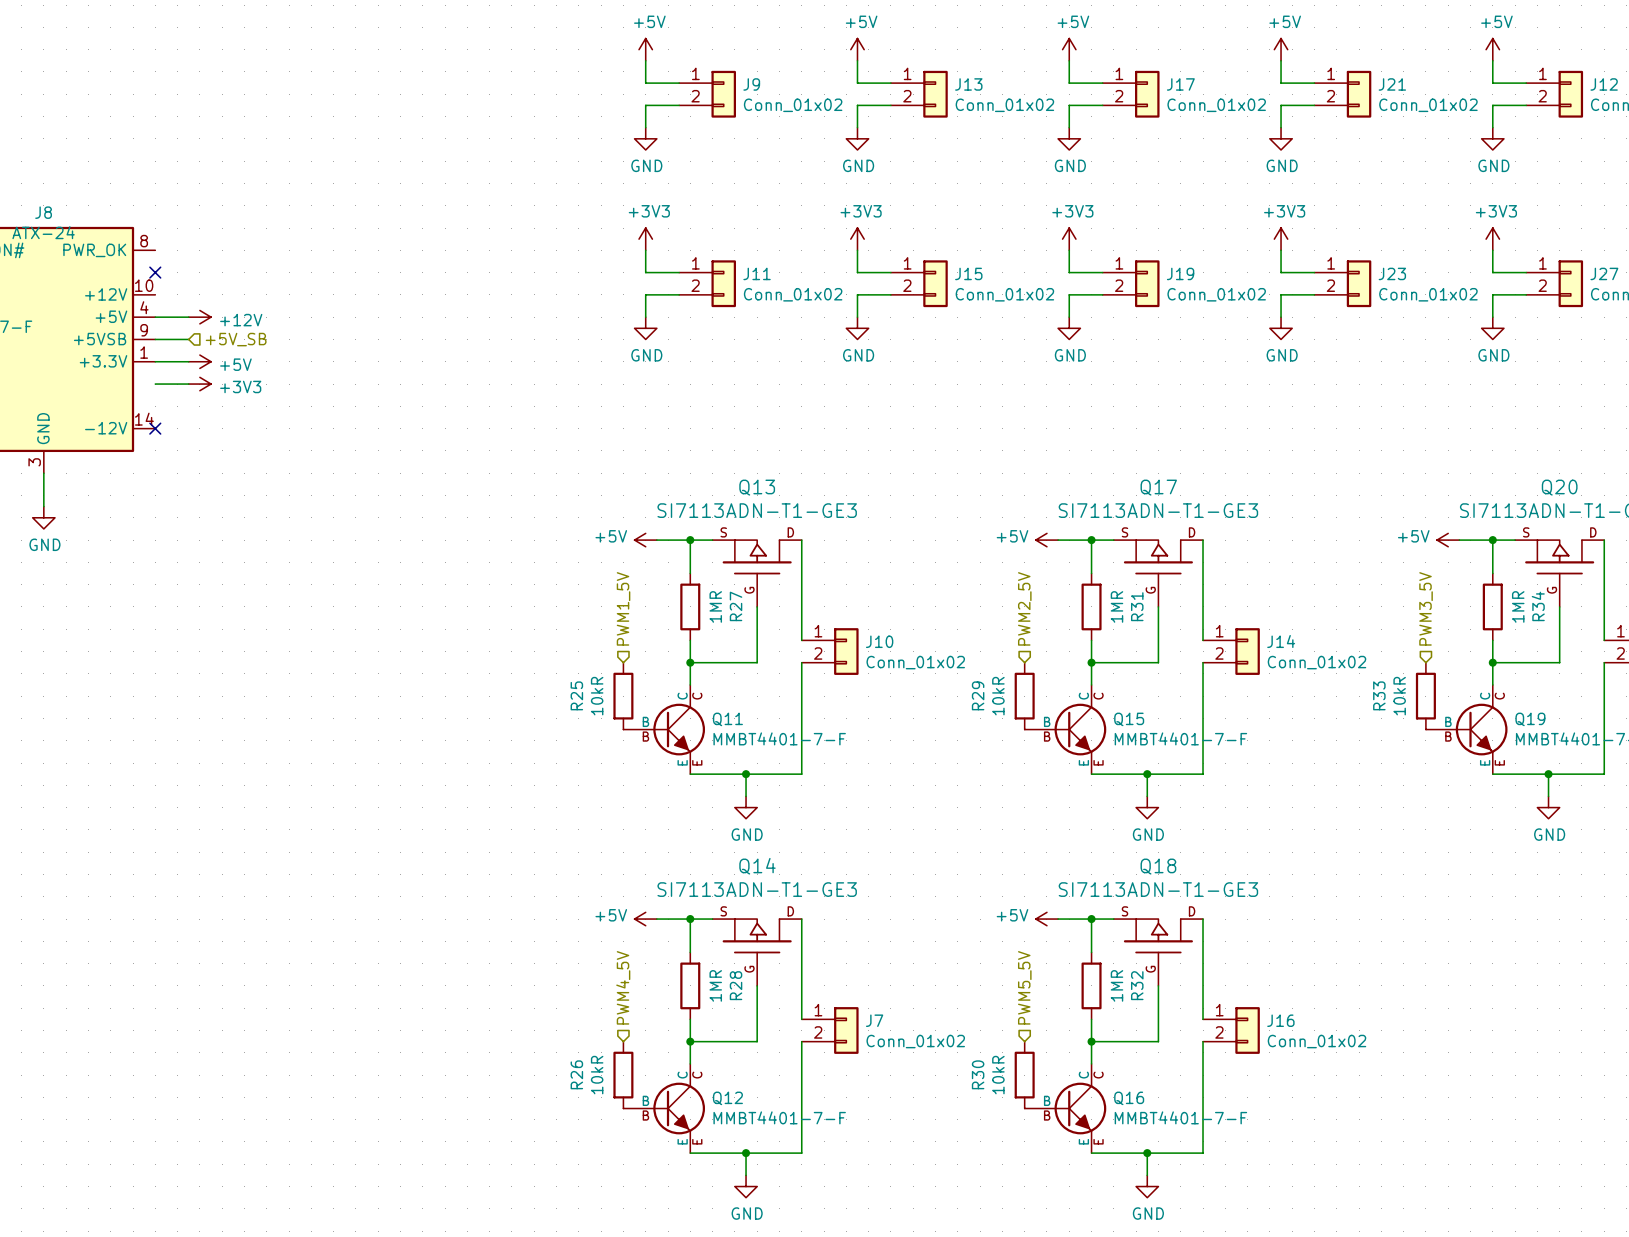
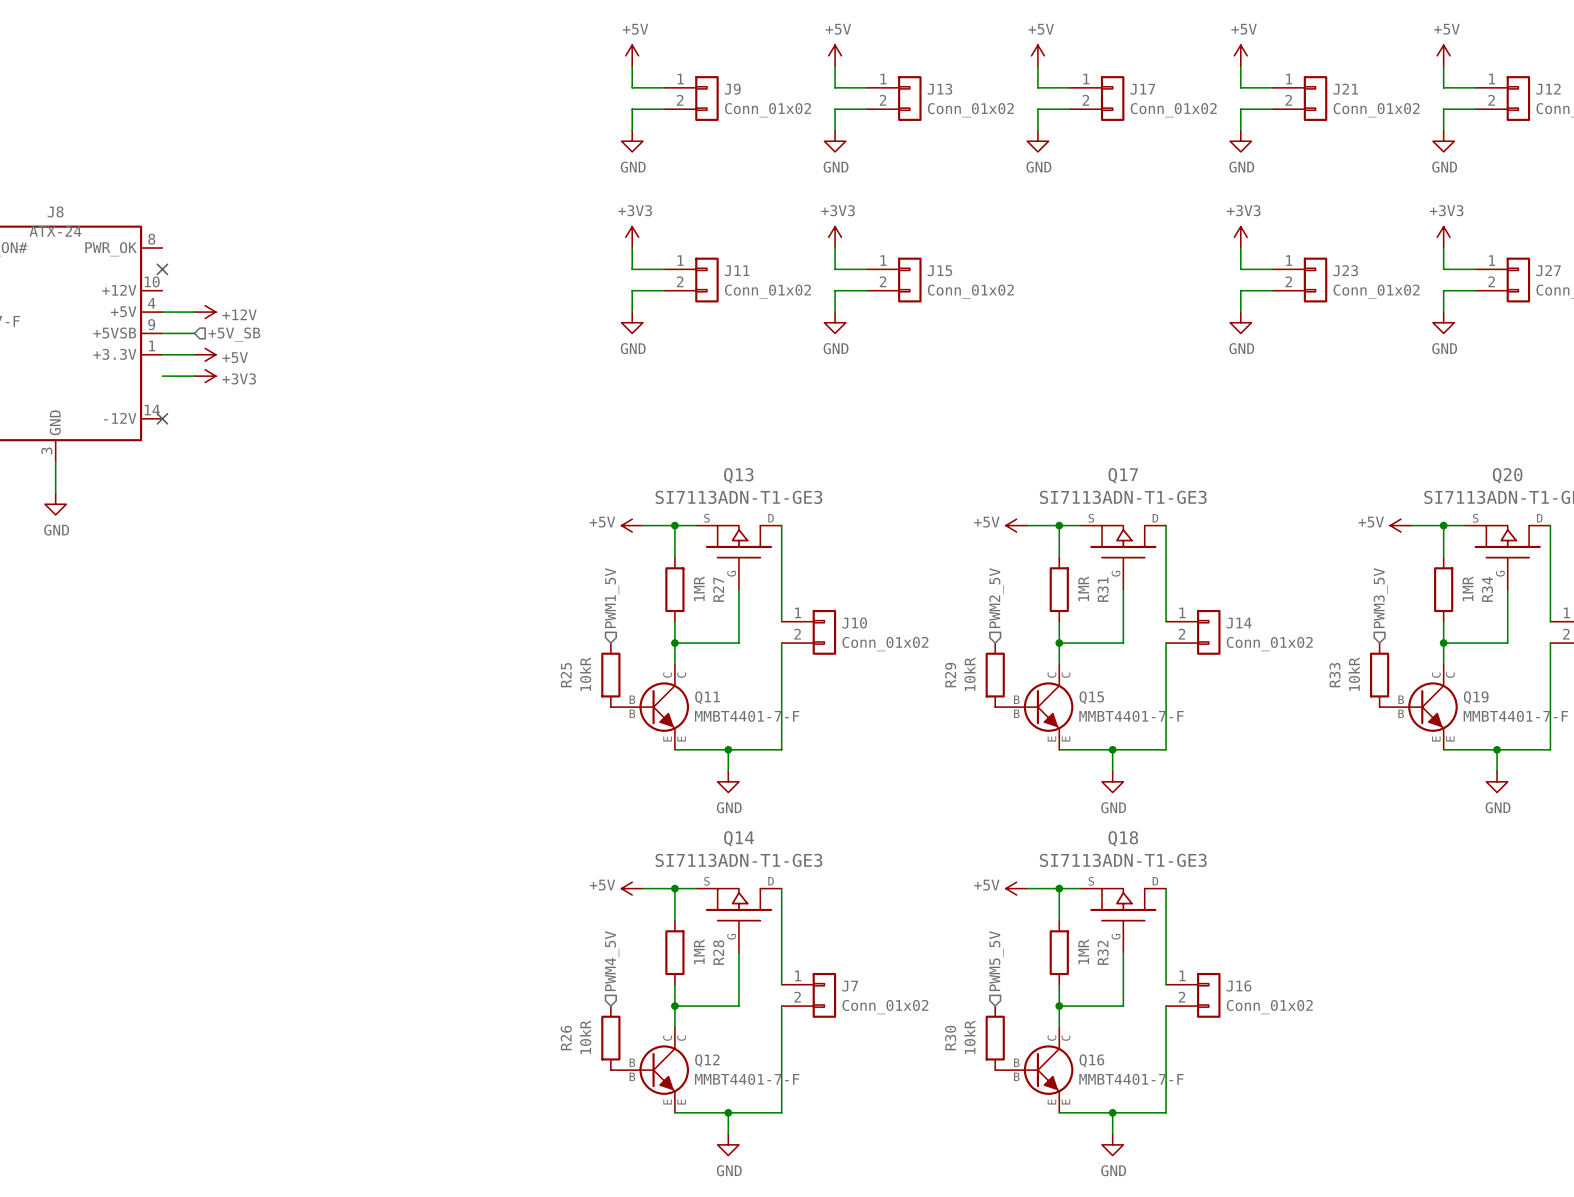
power symbol: +3V3 (1069, 239) -> none
wire: (1069, 250) (1069, 272) (1102, 272) -> none
J19: Conn_01x02 (1131, 283) -> none
wire: (1102, 294) (1069, 294) (1069, 317) -> none
power symbol: GND (1069, 328) -> none

